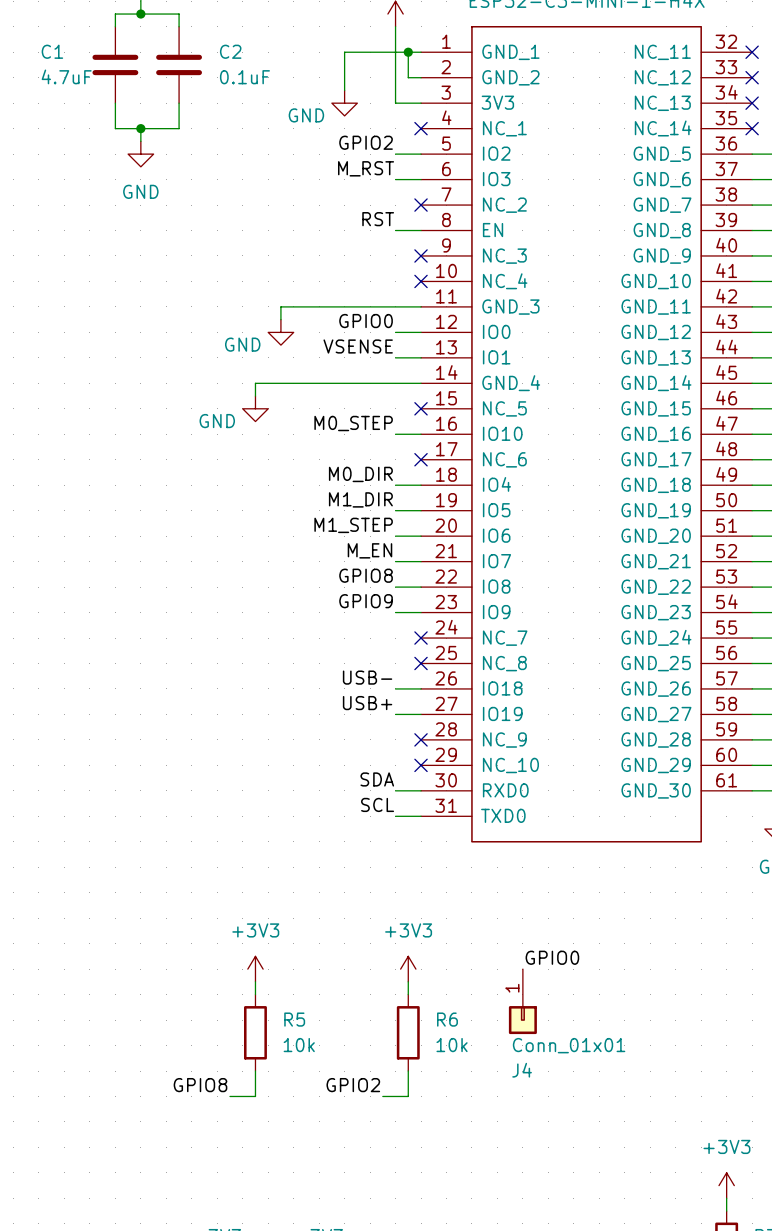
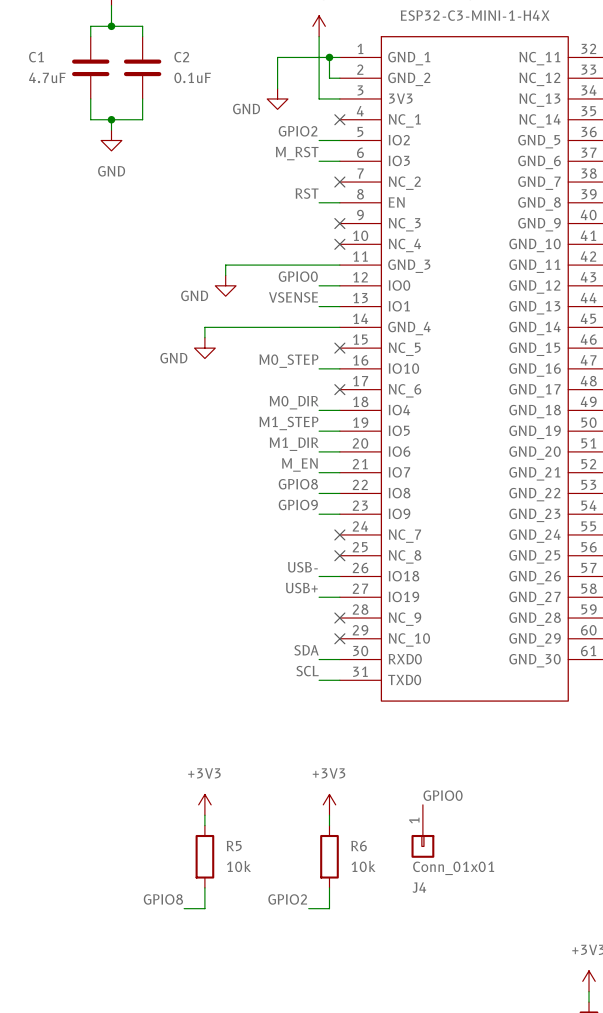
label: M1_DIR (360, 499) -> M1_STEP (288, 423)
label: M1_STEP (353, 525) -> M1_DIR (294, 444)

